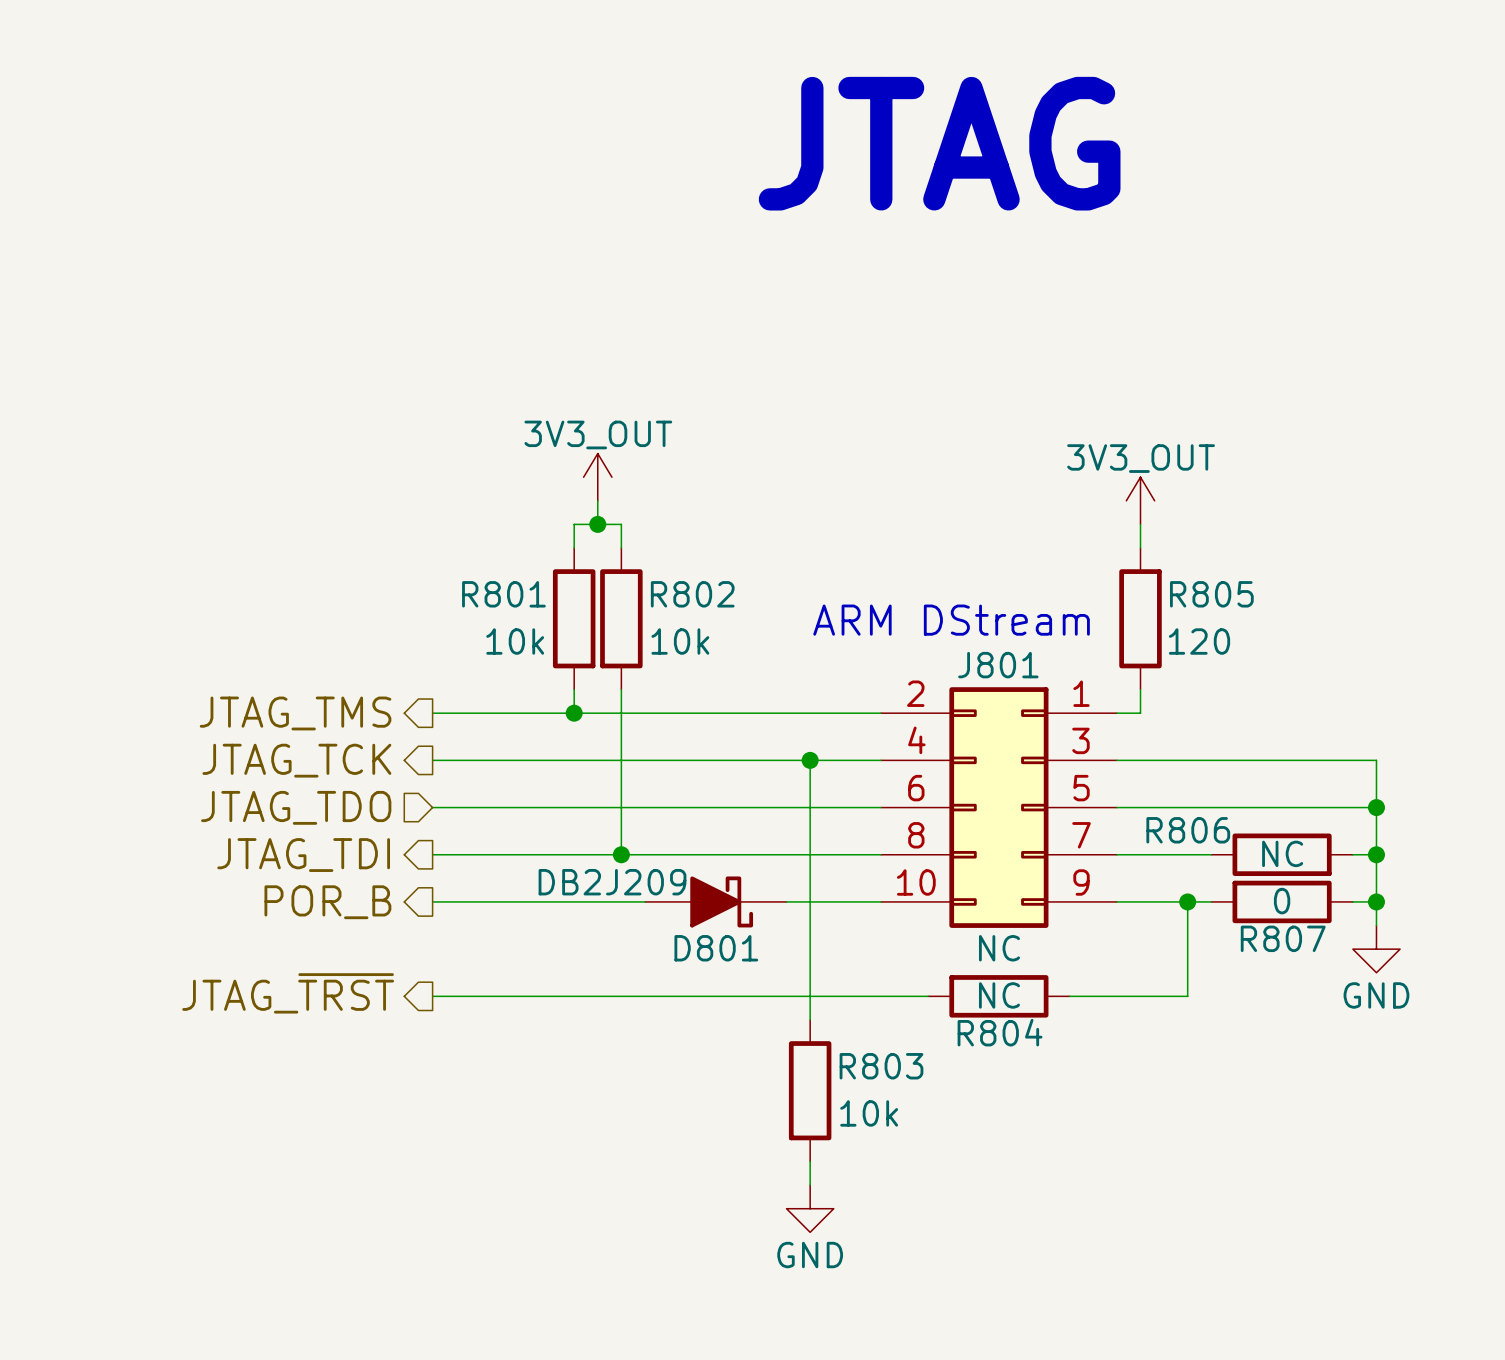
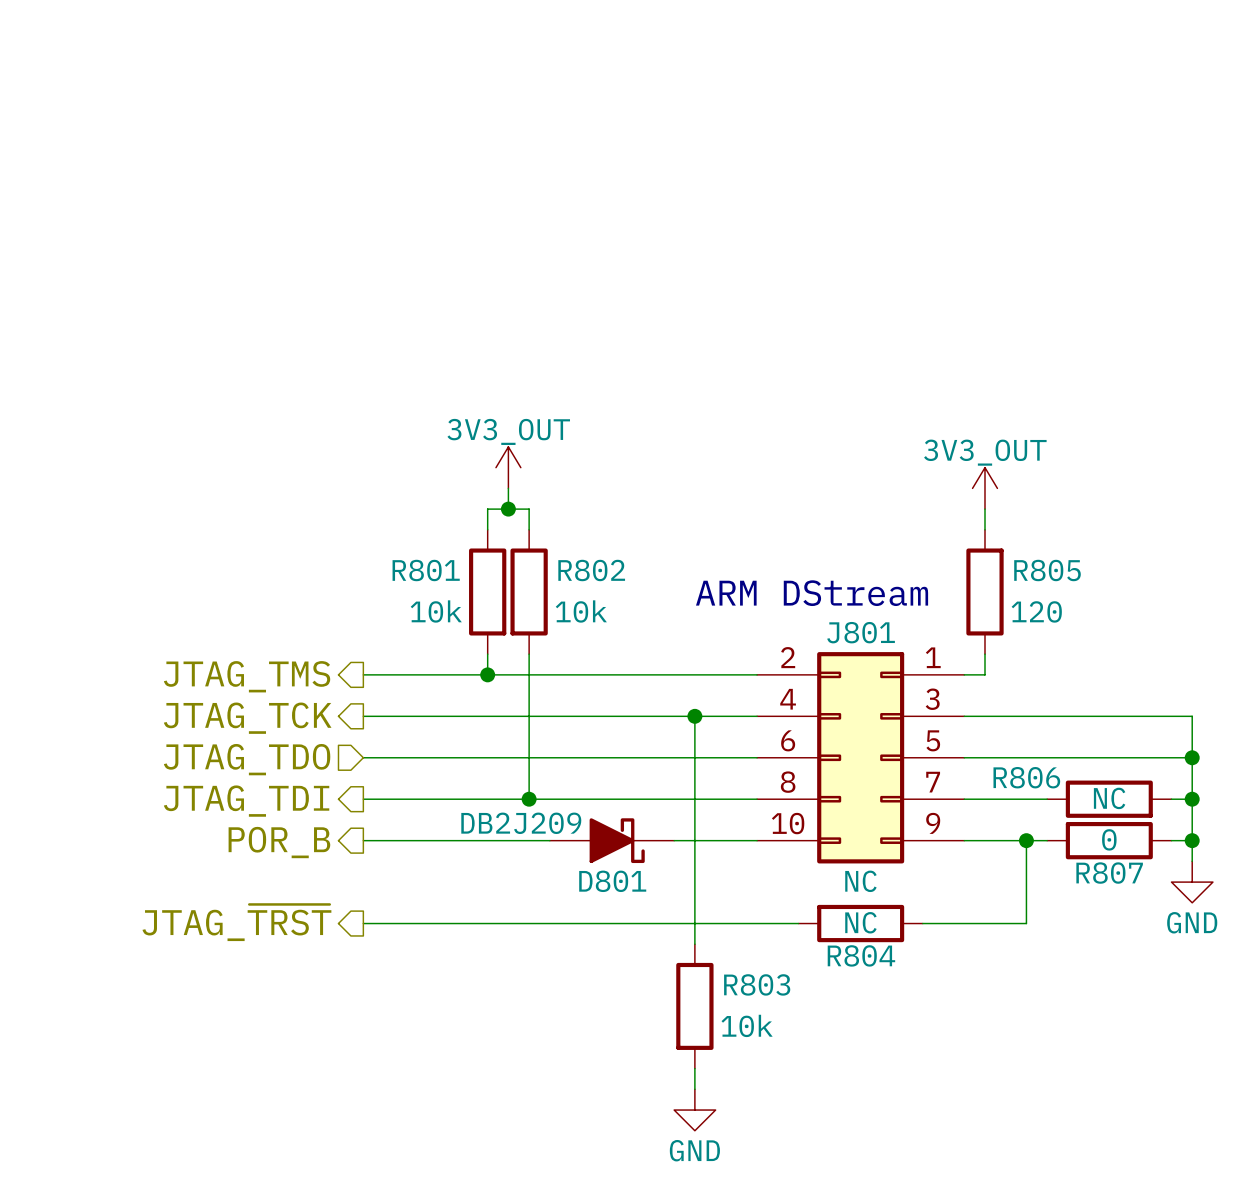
text: JTAG (939, 143) -> none

